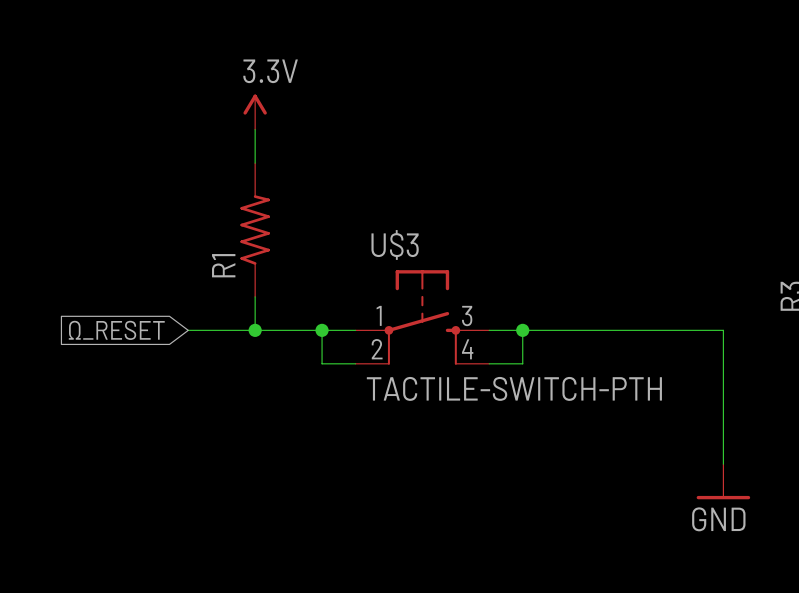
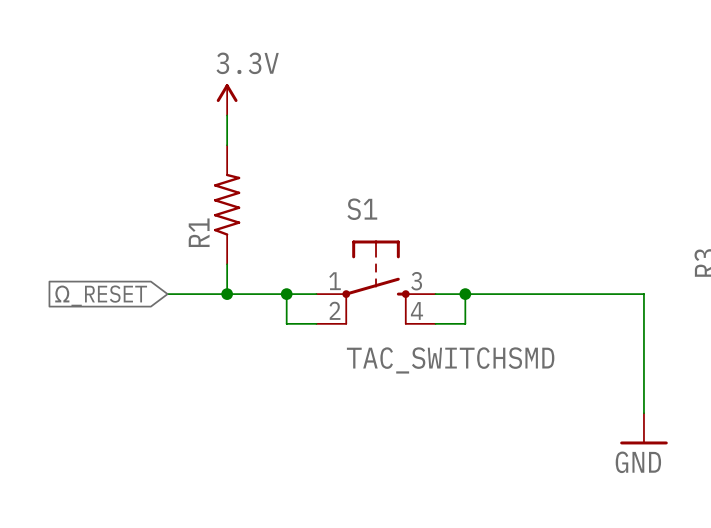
U$3 name: U$3 (395, 244) -> S1 (362, 209)
U$3 value: TACTILE-SWITCH-PTH (514, 388) -> TAC_SWITCHSMD (450, 360)

